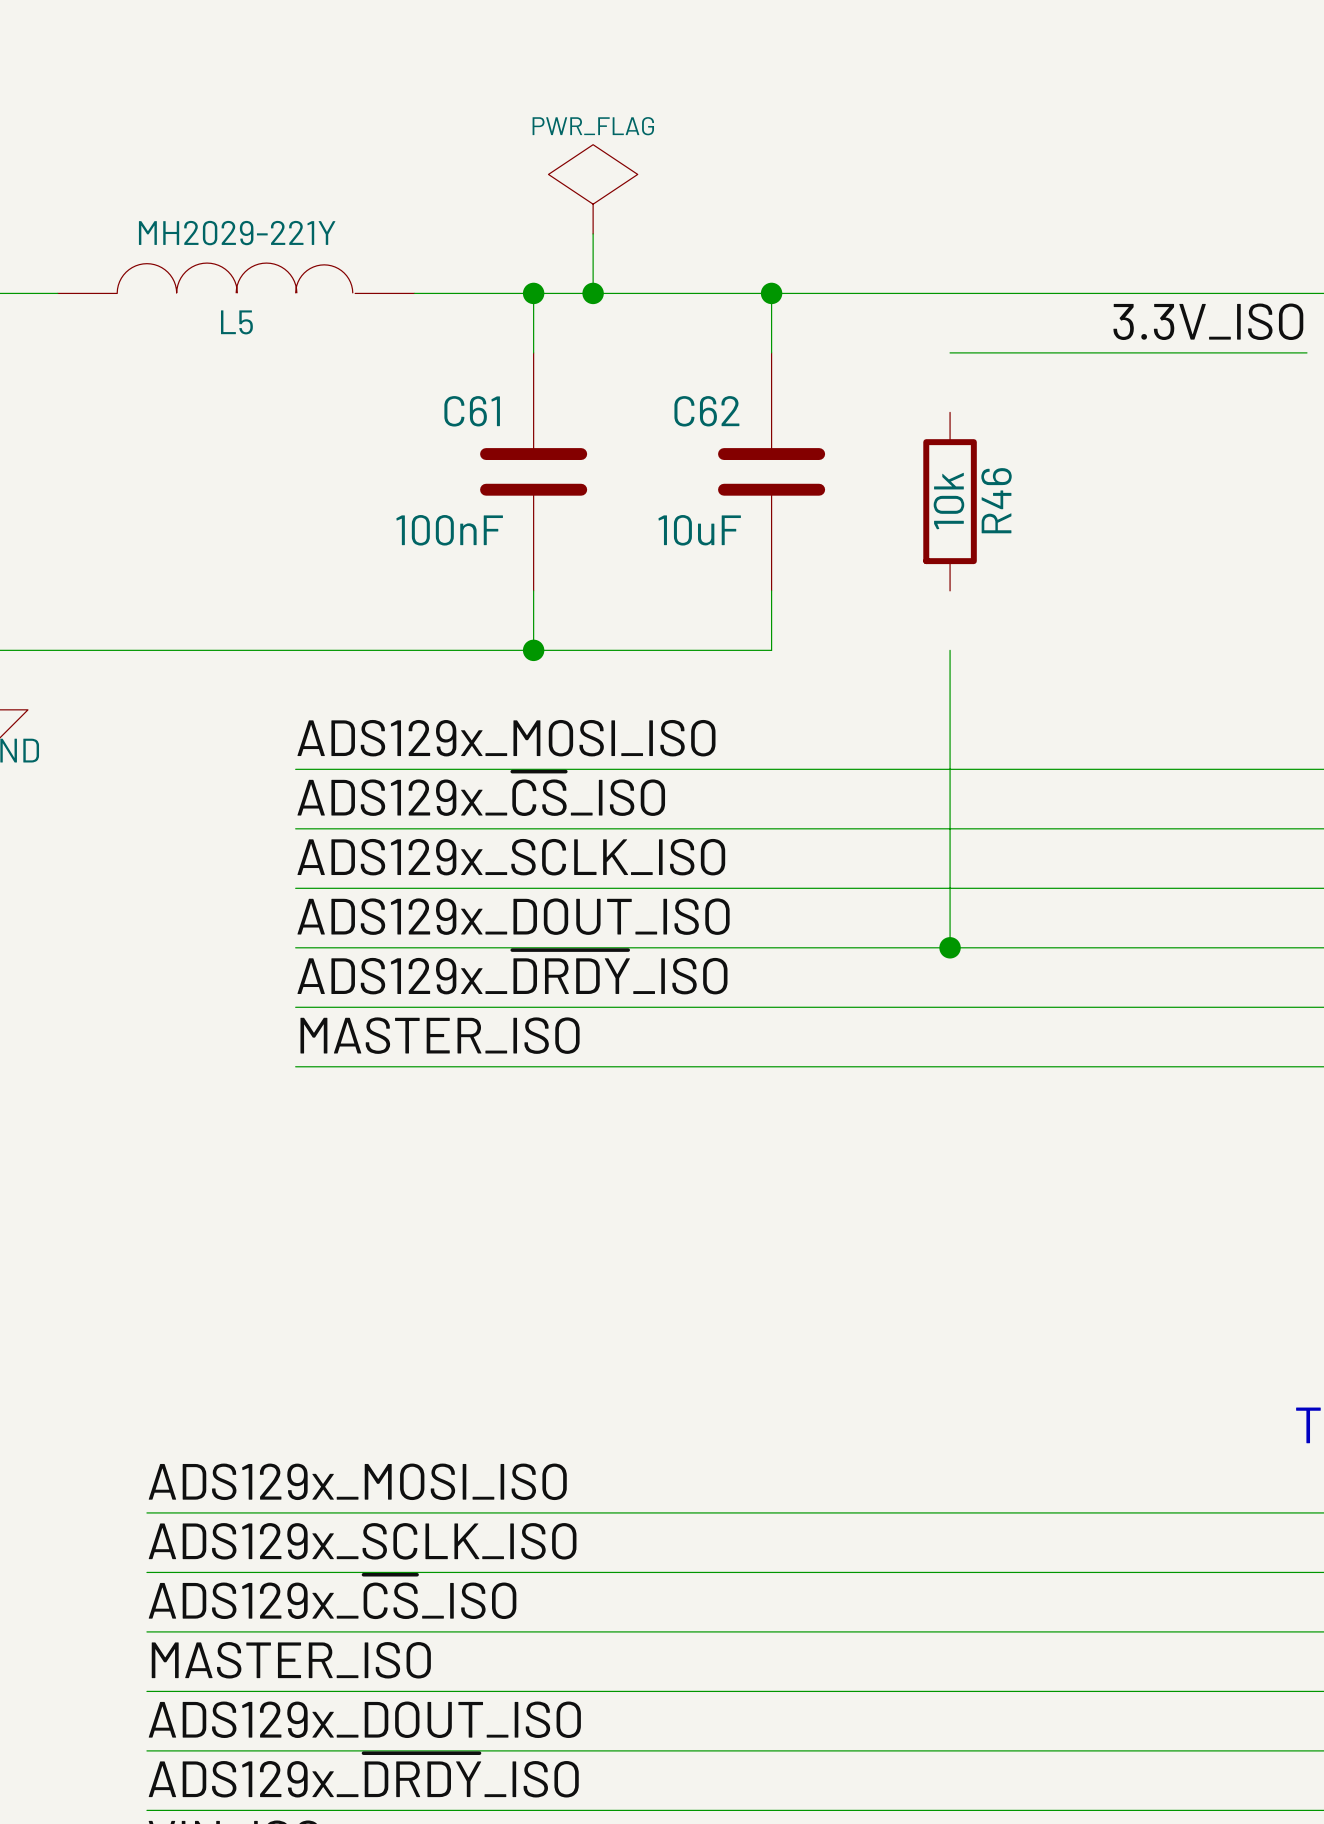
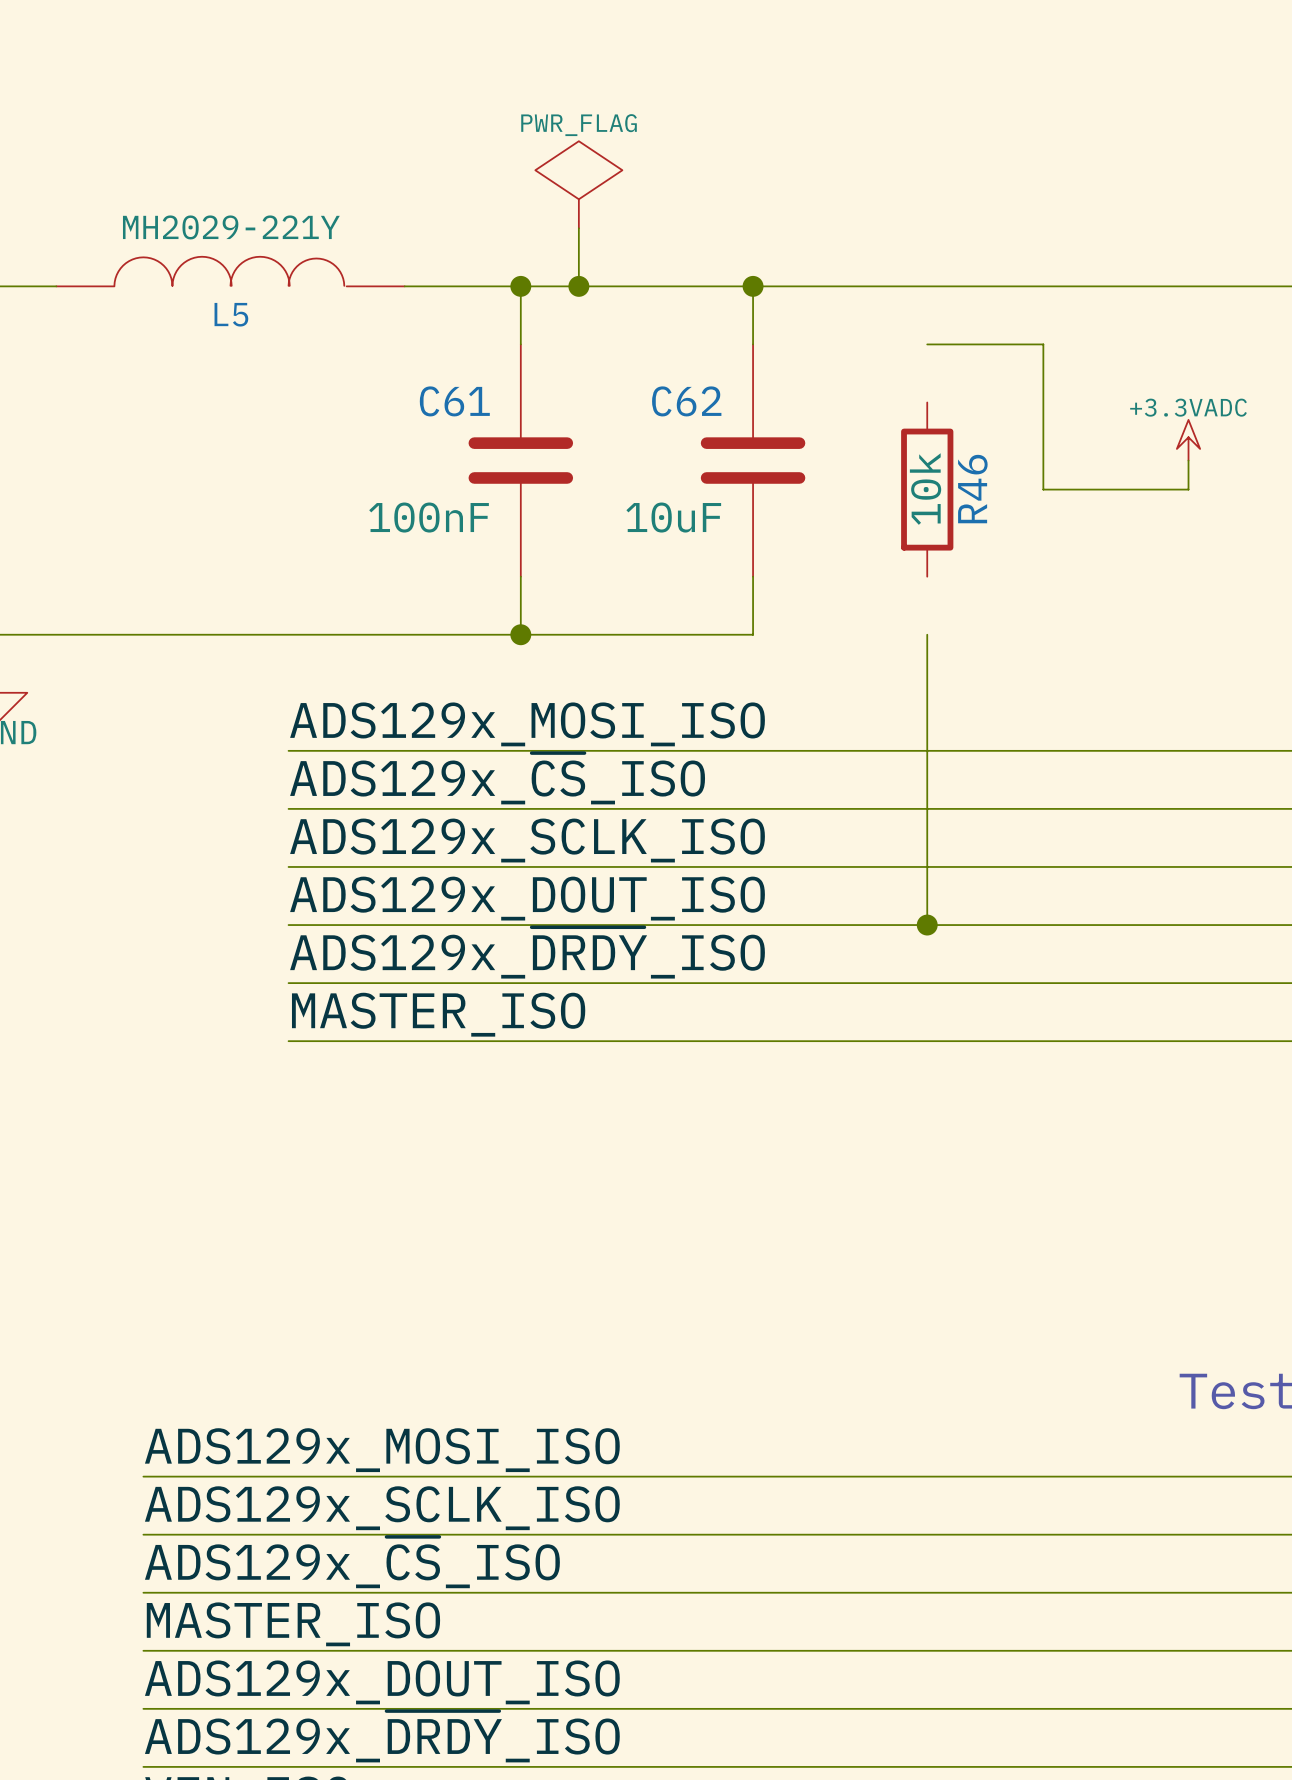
label: 3.3V_ISO (1208, 321) -> none
wire: (1069, 352) (1306, 352) -> (1043, 344) (1043, 489) (1188, 489) (1188, 460)
power symbol: none -> +3.3VADC (1188, 440)

